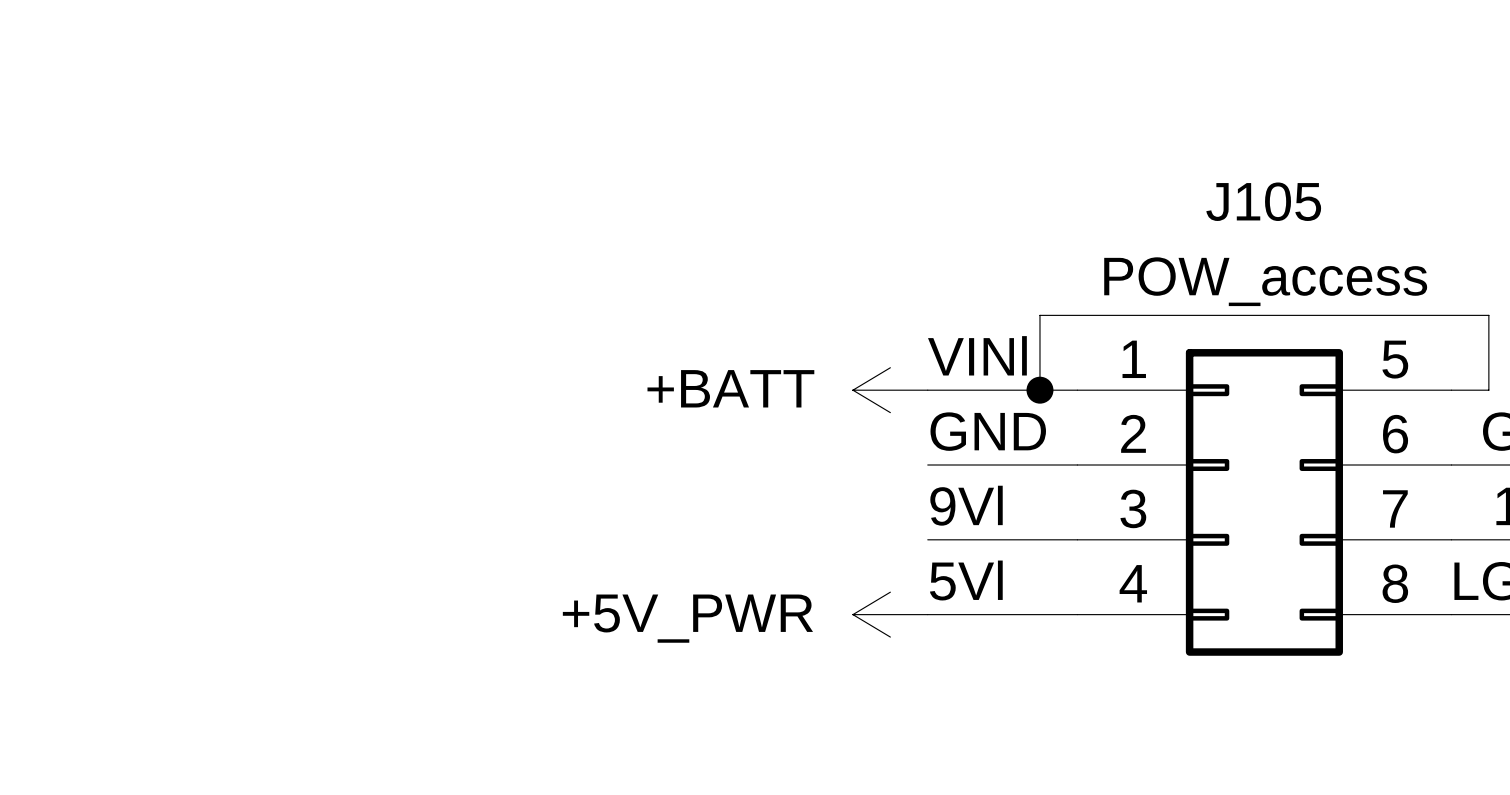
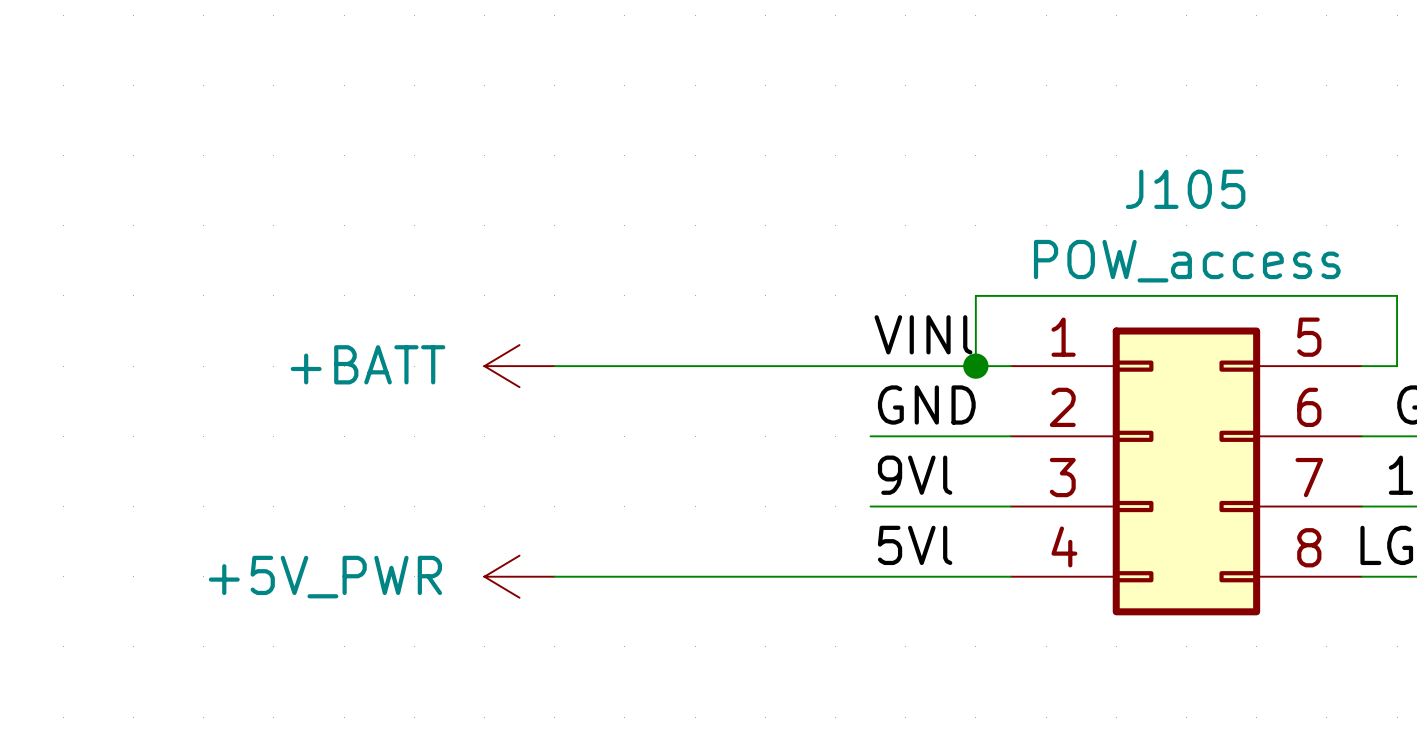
wire: none -> (554, 366) (870, 366)
power symbol position: +BATT (890, 390) -> +BATT (519, 366)
wire: none -> (554, 576) (870, 576)
power symbol position: +5V_PWR (890, 614) -> +5V_PWR (519, 576)

